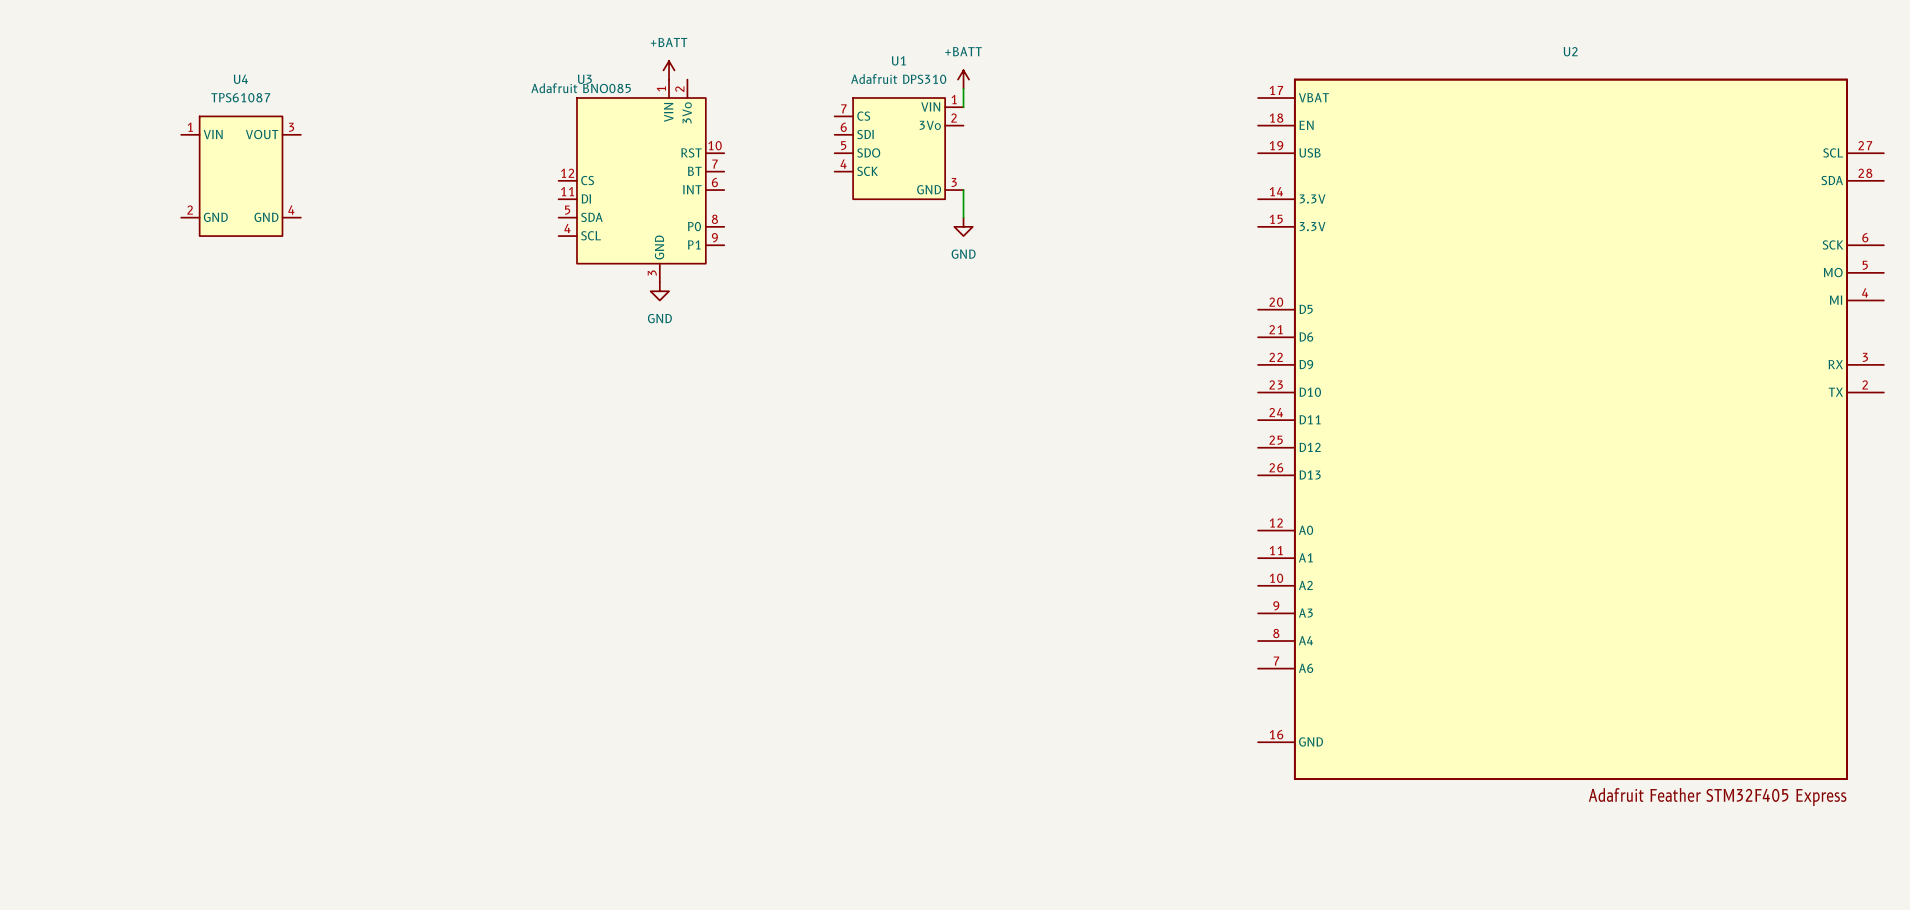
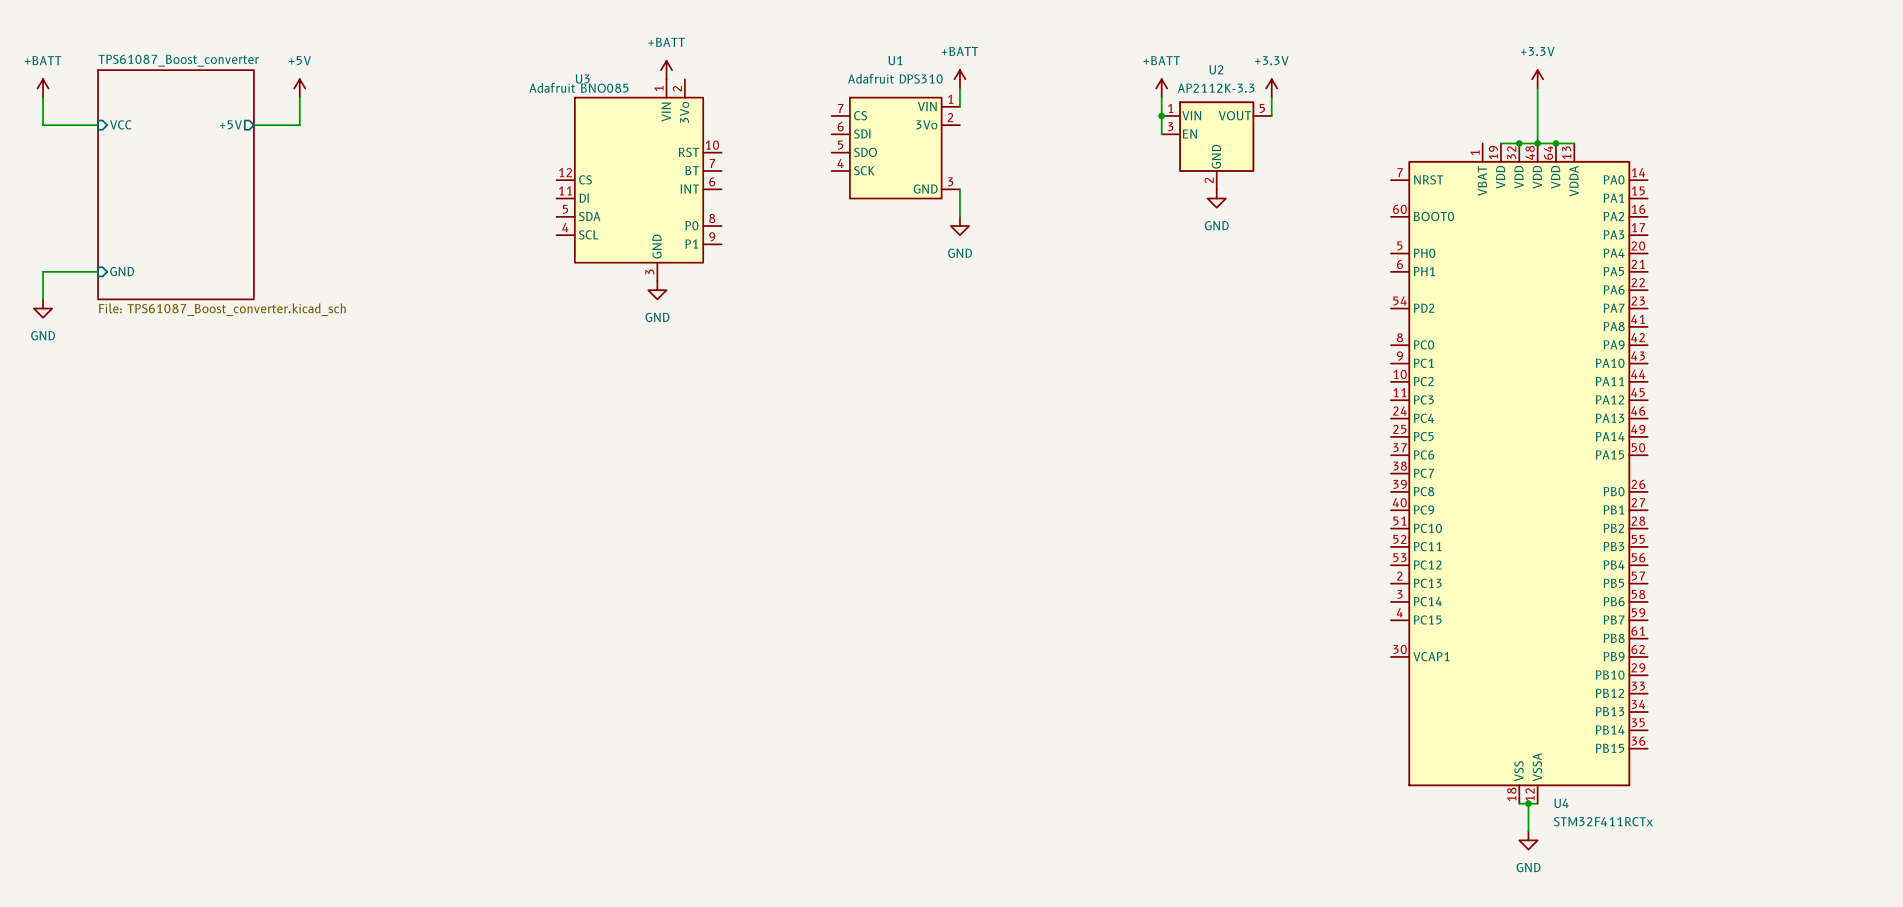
U2 name position: U2 (1570, 51) -> U2 (1216, 69)
U2 symbol: [1258, 78, 1884, 780] -> [1161, 101, 1272, 190]
U4 name position: U4 (240, 79) -> U4 (1561, 803)
power symbol: none -> +3.3V (1537, 79)
power symbol: none -> +BATT (43, 88)
power symbol: none -> +5V (299, 88)
power symbol: none -> +BATT (1161, 88)
U2 value: none -> AP2112K-3.3 (1216, 88)
power symbol: none -> +3.3V (1271, 88)
U4 value: TPS61087 (240, 97) -> STM32F411RCTx (1603, 821)
wire: none -> (43, 97) (43, 125) (98, 125)
wire: none -> (299, 97) (299, 125) (253, 125)
wire: none -> (1161, 97) (1161, 134)
wire: none -> (1271, 97) (1271, 115)
U4 symbol: [181, 116, 301, 237] -> [1390, 143, 1648, 804]
junction: none -> (1161, 115)
sheet pin: none -> VCC (120, 124)
sheet pin: none -> +5V (230, 124)
junction: none -> (1519, 143)
junction: none -> (1537, 143)
junction: none -> (1555, 143)
sheet TPS61087_Boost_converter: none -> File: TPS61087_Boost_converter.kicad_sch (175, 184)
power symbol: none -> GND (1216, 198)
wire: none -> (98, 271) (43, 271) (43, 299)
sheet pin: none -> GND (122, 271)
power symbol: none -> GND (43, 308)
wire: none -> (1519, 803) (1537, 803)
wire: none -> (1528, 803) (1528, 831)
junction: none -> (1528, 803)
power symbol: none -> GND (1528, 840)

